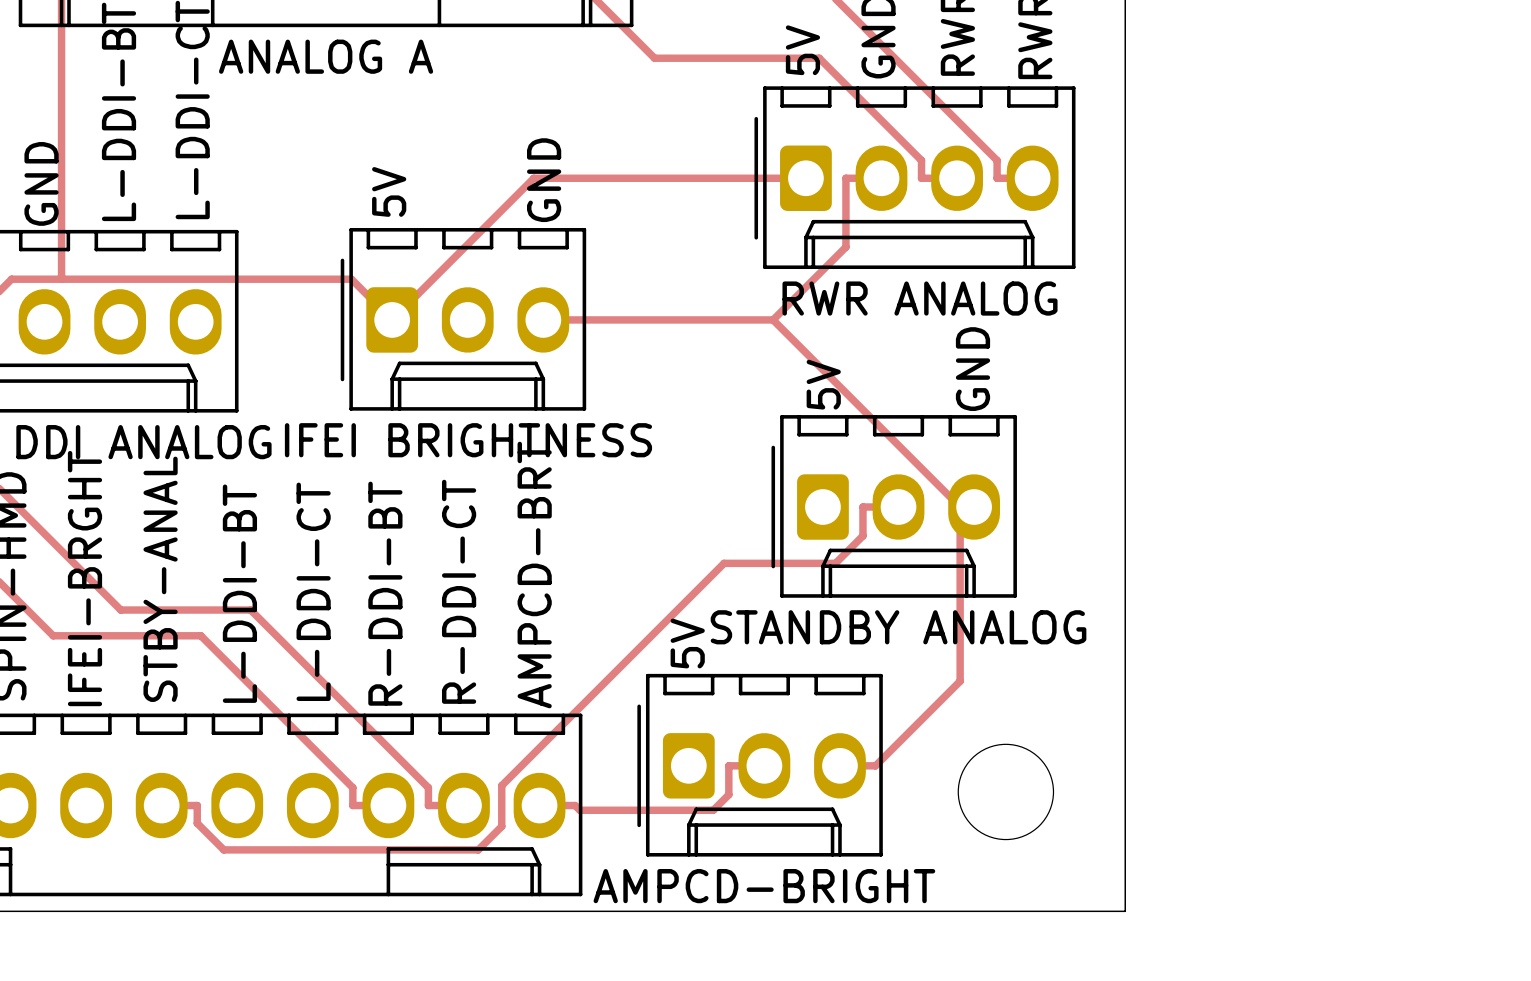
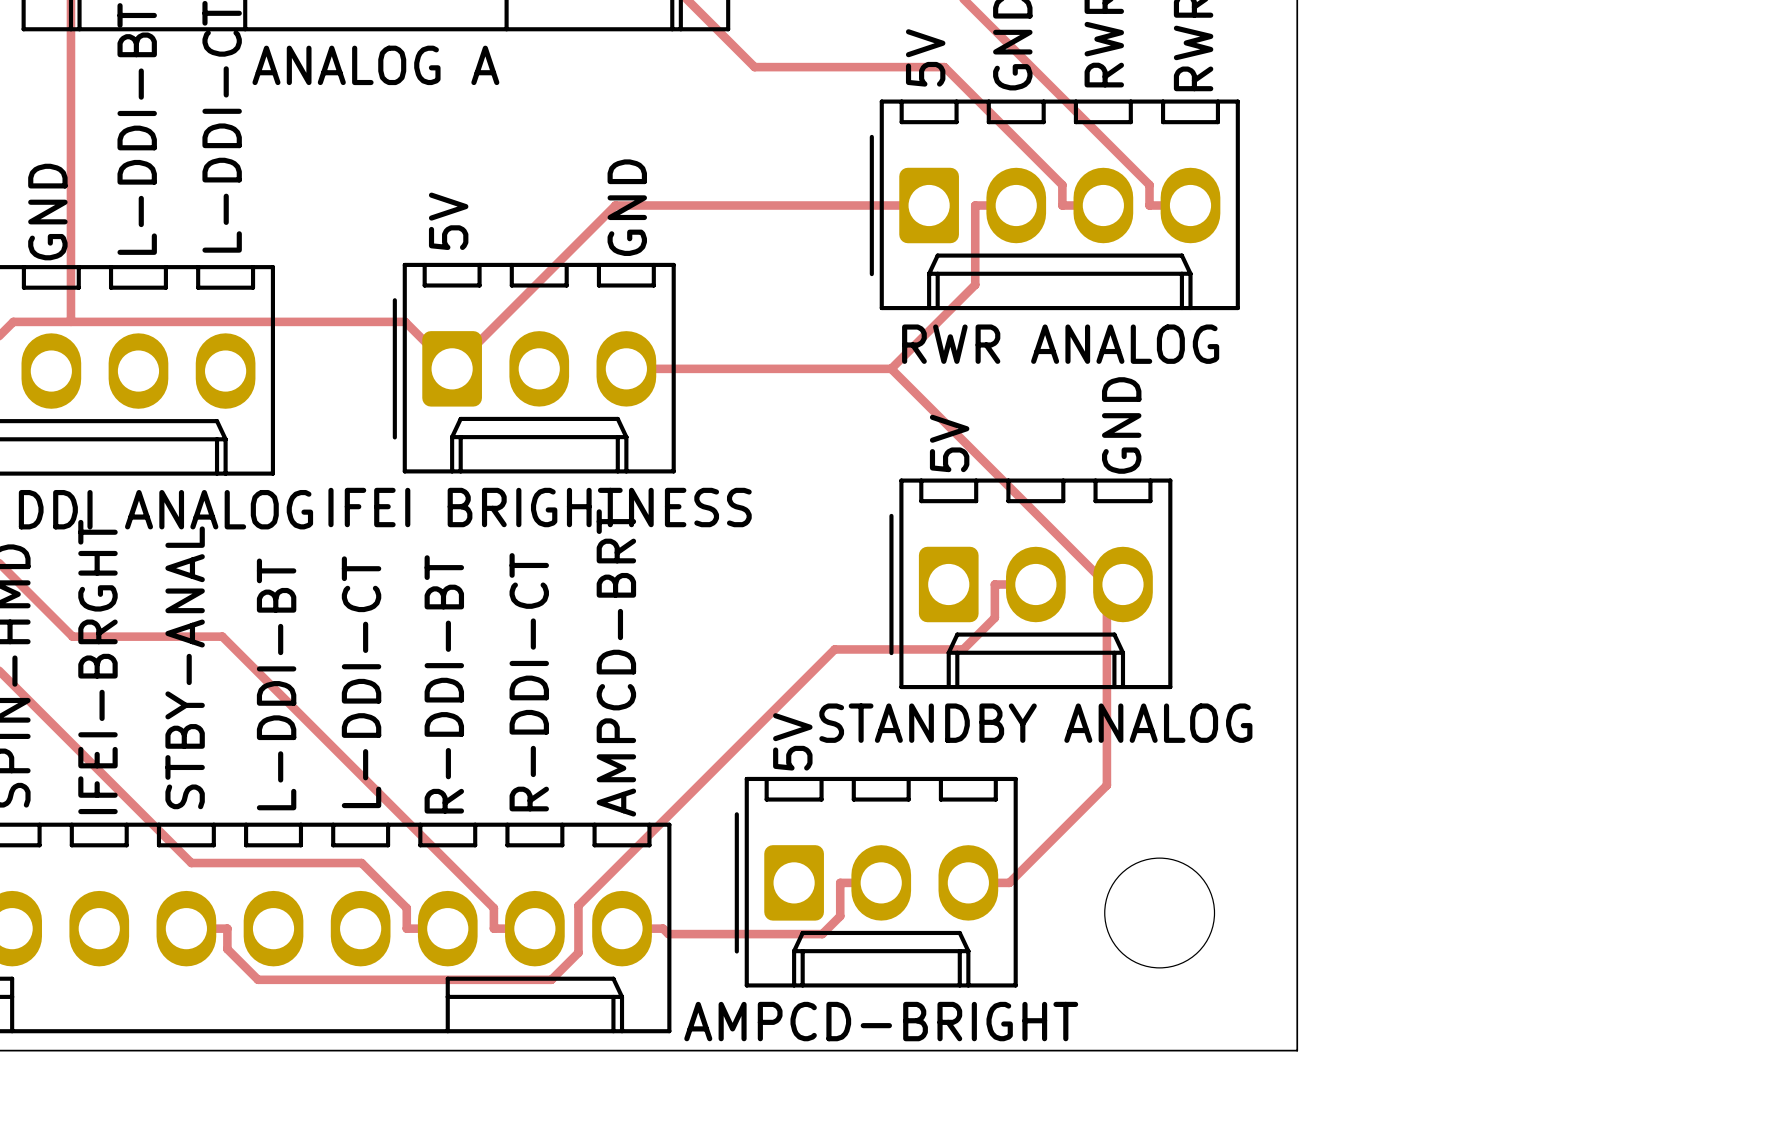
track: (63, 552) (120, 610) (250, 610) -> (72, 636) (222, 636) (289, 703)
track: (53, 635) (200, 635) (313, 748) -> (61, 732) (191, 863) (361, 863)

